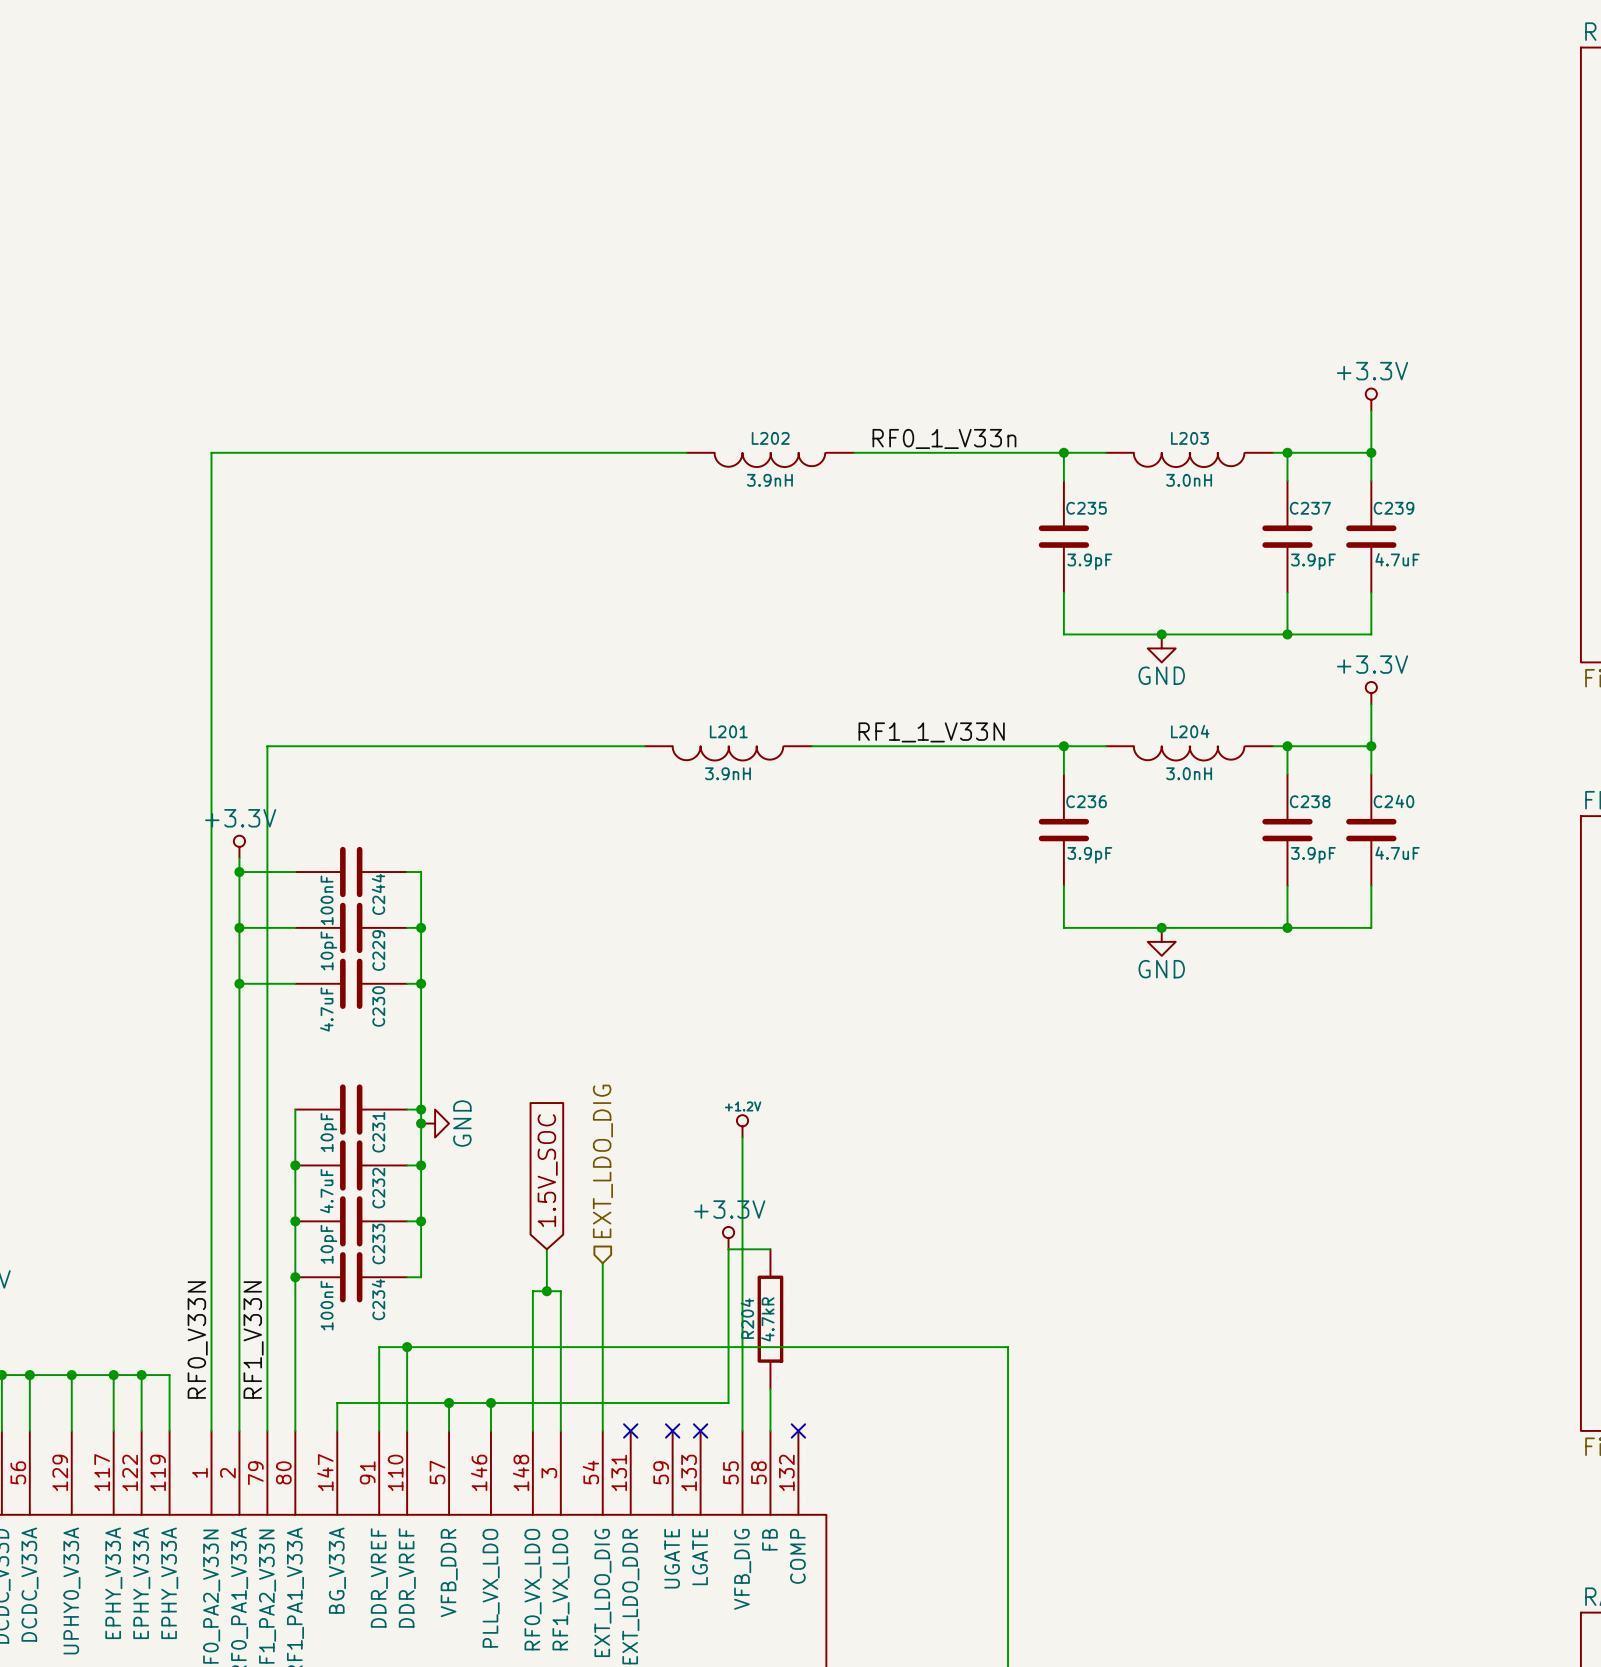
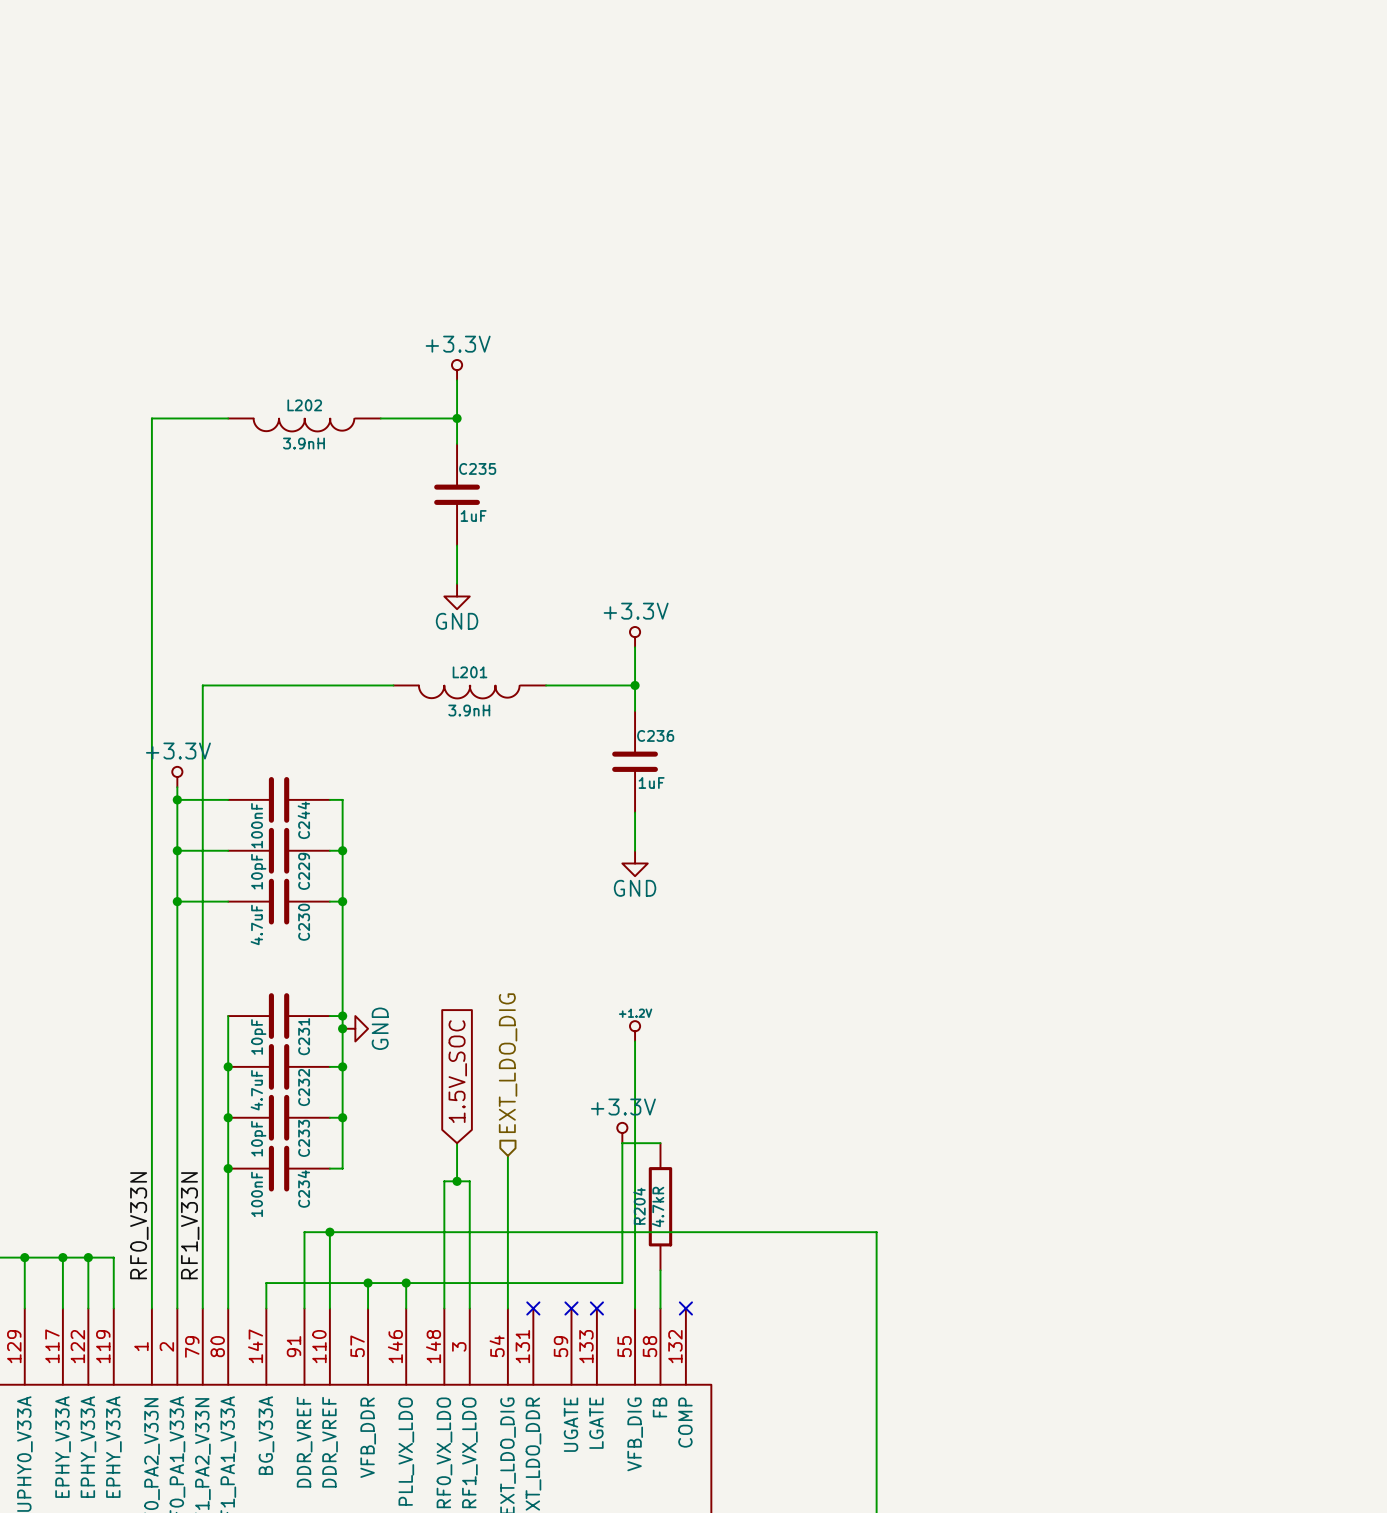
power symbol: none -> +3.3V (457, 370)
power symbol: +3.3V (1371, 399) -> none
wire: none -> (457, 380) (457, 443)
wire: (1371, 410) (1371, 480) -> none
label: RF0_1_V33n (944, 438) -> none
wire: (295, 452) (463, 452) -> none
wire: (546, 452) (686, 452) -> none
junction: none -> (457, 418)
wire: (854, 452) (1105, 452) -> none
wire: (1063, 452) (1063, 480) -> none
junction: (1063, 452) -> none
wire: (1273, 452) (1371, 452) -> none
wire: (1287, 452) (1287, 480) -> none
junction: (1287, 452) -> none
junction: (1371, 452) -> none
L202 position: (770, 459) -> (304, 424)
L203: 3.0nH (1189, 459) -> none
C235 position: (1063, 536) -> (457, 494)
C237: 3.9pF (1287, 536) -> none
C239: 4.7uF (1371, 536) -> none
C235 value: 3.9pF (1089, 561) -> 1uF (473, 515)
wire: none -> (457, 545) (457, 583)
wire: (1063, 592) (1063, 634) (1371, 634) (1371, 592) -> none
wire: (1287, 592) (1287, 634) -> none
junction: (1161, 634) -> none
junction: (1287, 634) -> none
power symbol: none -> GND (457, 596)
power symbol: GND (1161, 648) -> none
power symbol: none -> +3.3V (635, 637)
power symbol: +3.3V (1371, 693) -> none
wire: none -> (635, 647) (635, 710)
wire: (1371, 704) (1371, 774) -> none
label: RF1_1_V33N (931, 732) -> none
wire: (477, 746) (644, 746) -> (635, 685) (546, 685)
junction: none -> (635, 685)
wire: (812, 746) (1105, 746) -> none
wire: (1063, 746) (1063, 774) -> none
junction: (1063, 746) -> none
wire: (1273, 746) (1371, 746) -> none
wire: (1287, 746) (1287, 774) -> none
junction: (1287, 746) -> none
junction: (1371, 746) -> none
L201 position: (728, 753) -> (469, 691)
L204: 3.0nH (1189, 753) -> none
C236 position: (1063, 830) -> (635, 761)
C238: 3.9pF (1287, 830) -> none
C240: 4.7uF (1371, 830) -> none
C236 value: 3.9pF (1089, 855) -> 1uF (651, 782)
wire: none -> (635, 812) (635, 850)
wire: (1063, 885) (1063, 927) (1371, 927) (1371, 885) -> none
wire: (1287, 885) (1287, 927) -> none
junction: (1161, 927) -> none
junction: (1287, 927) -> none
power symbol: none -> GND (635, 863)
power symbol: GND (1161, 941) -> none

